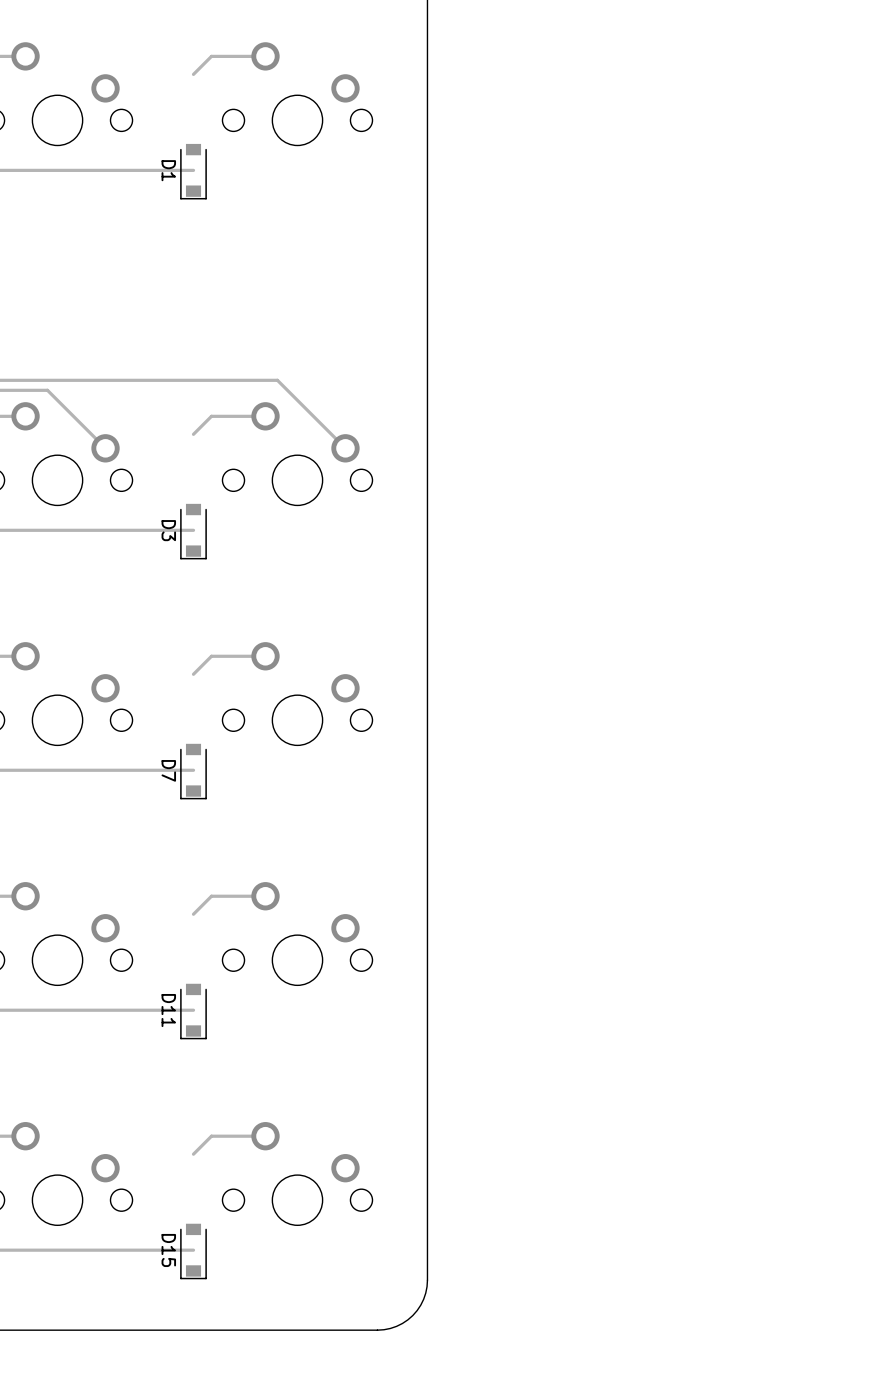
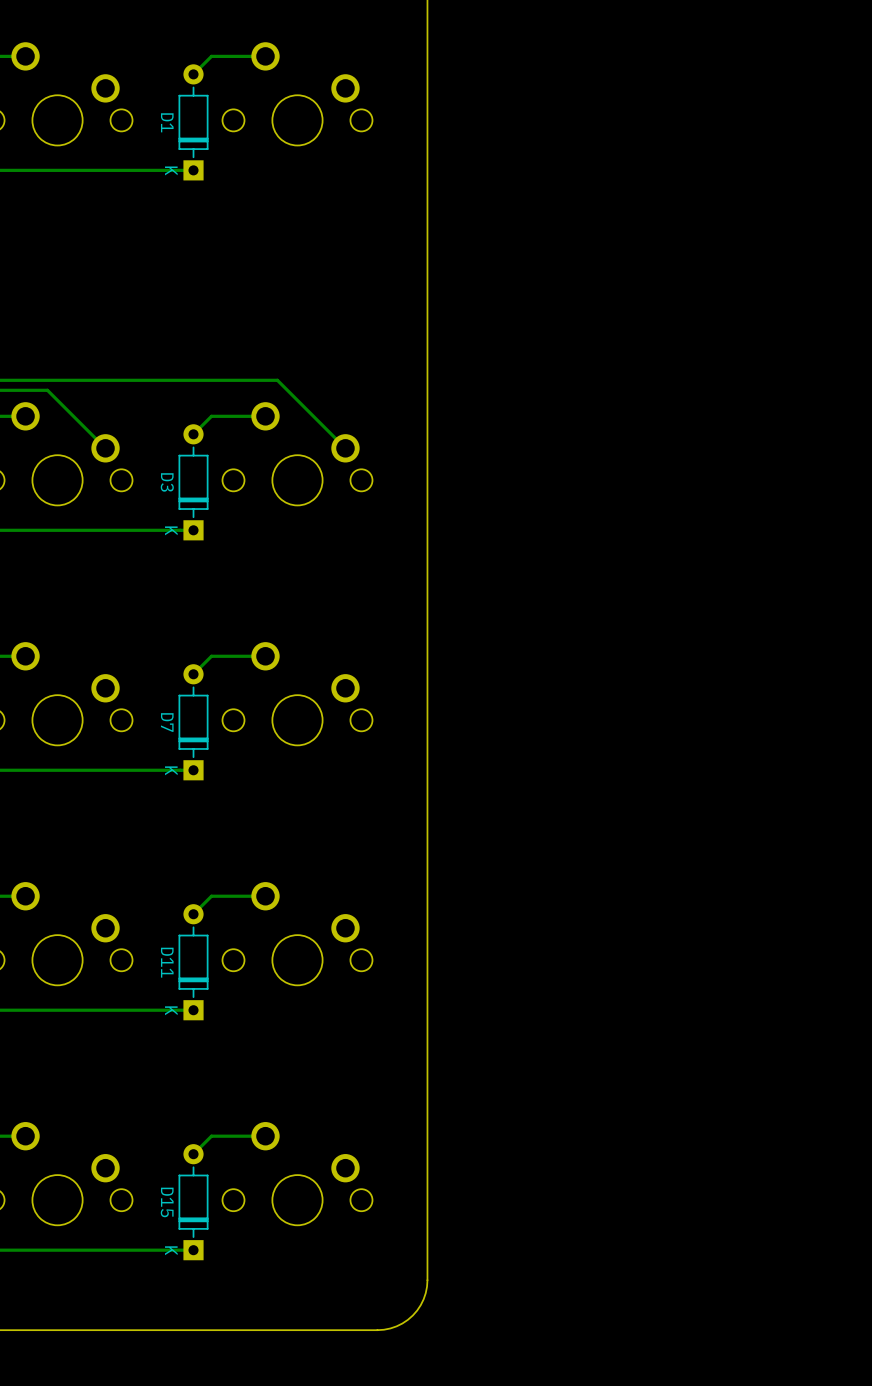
D1 footprint: [180, 143, 207, 200] -> [178, 64, 209, 181]
D3 footprint: [180, 503, 207, 560] -> [178, 424, 209, 541]
D7 footprint: [180, 743, 207, 800] -> [178, 664, 209, 781]
D11 footprint: [180, 983, 207, 1040] -> [178, 904, 209, 1021]
D15 footprint: [180, 1223, 207, 1280] -> [178, 1144, 209, 1261]

